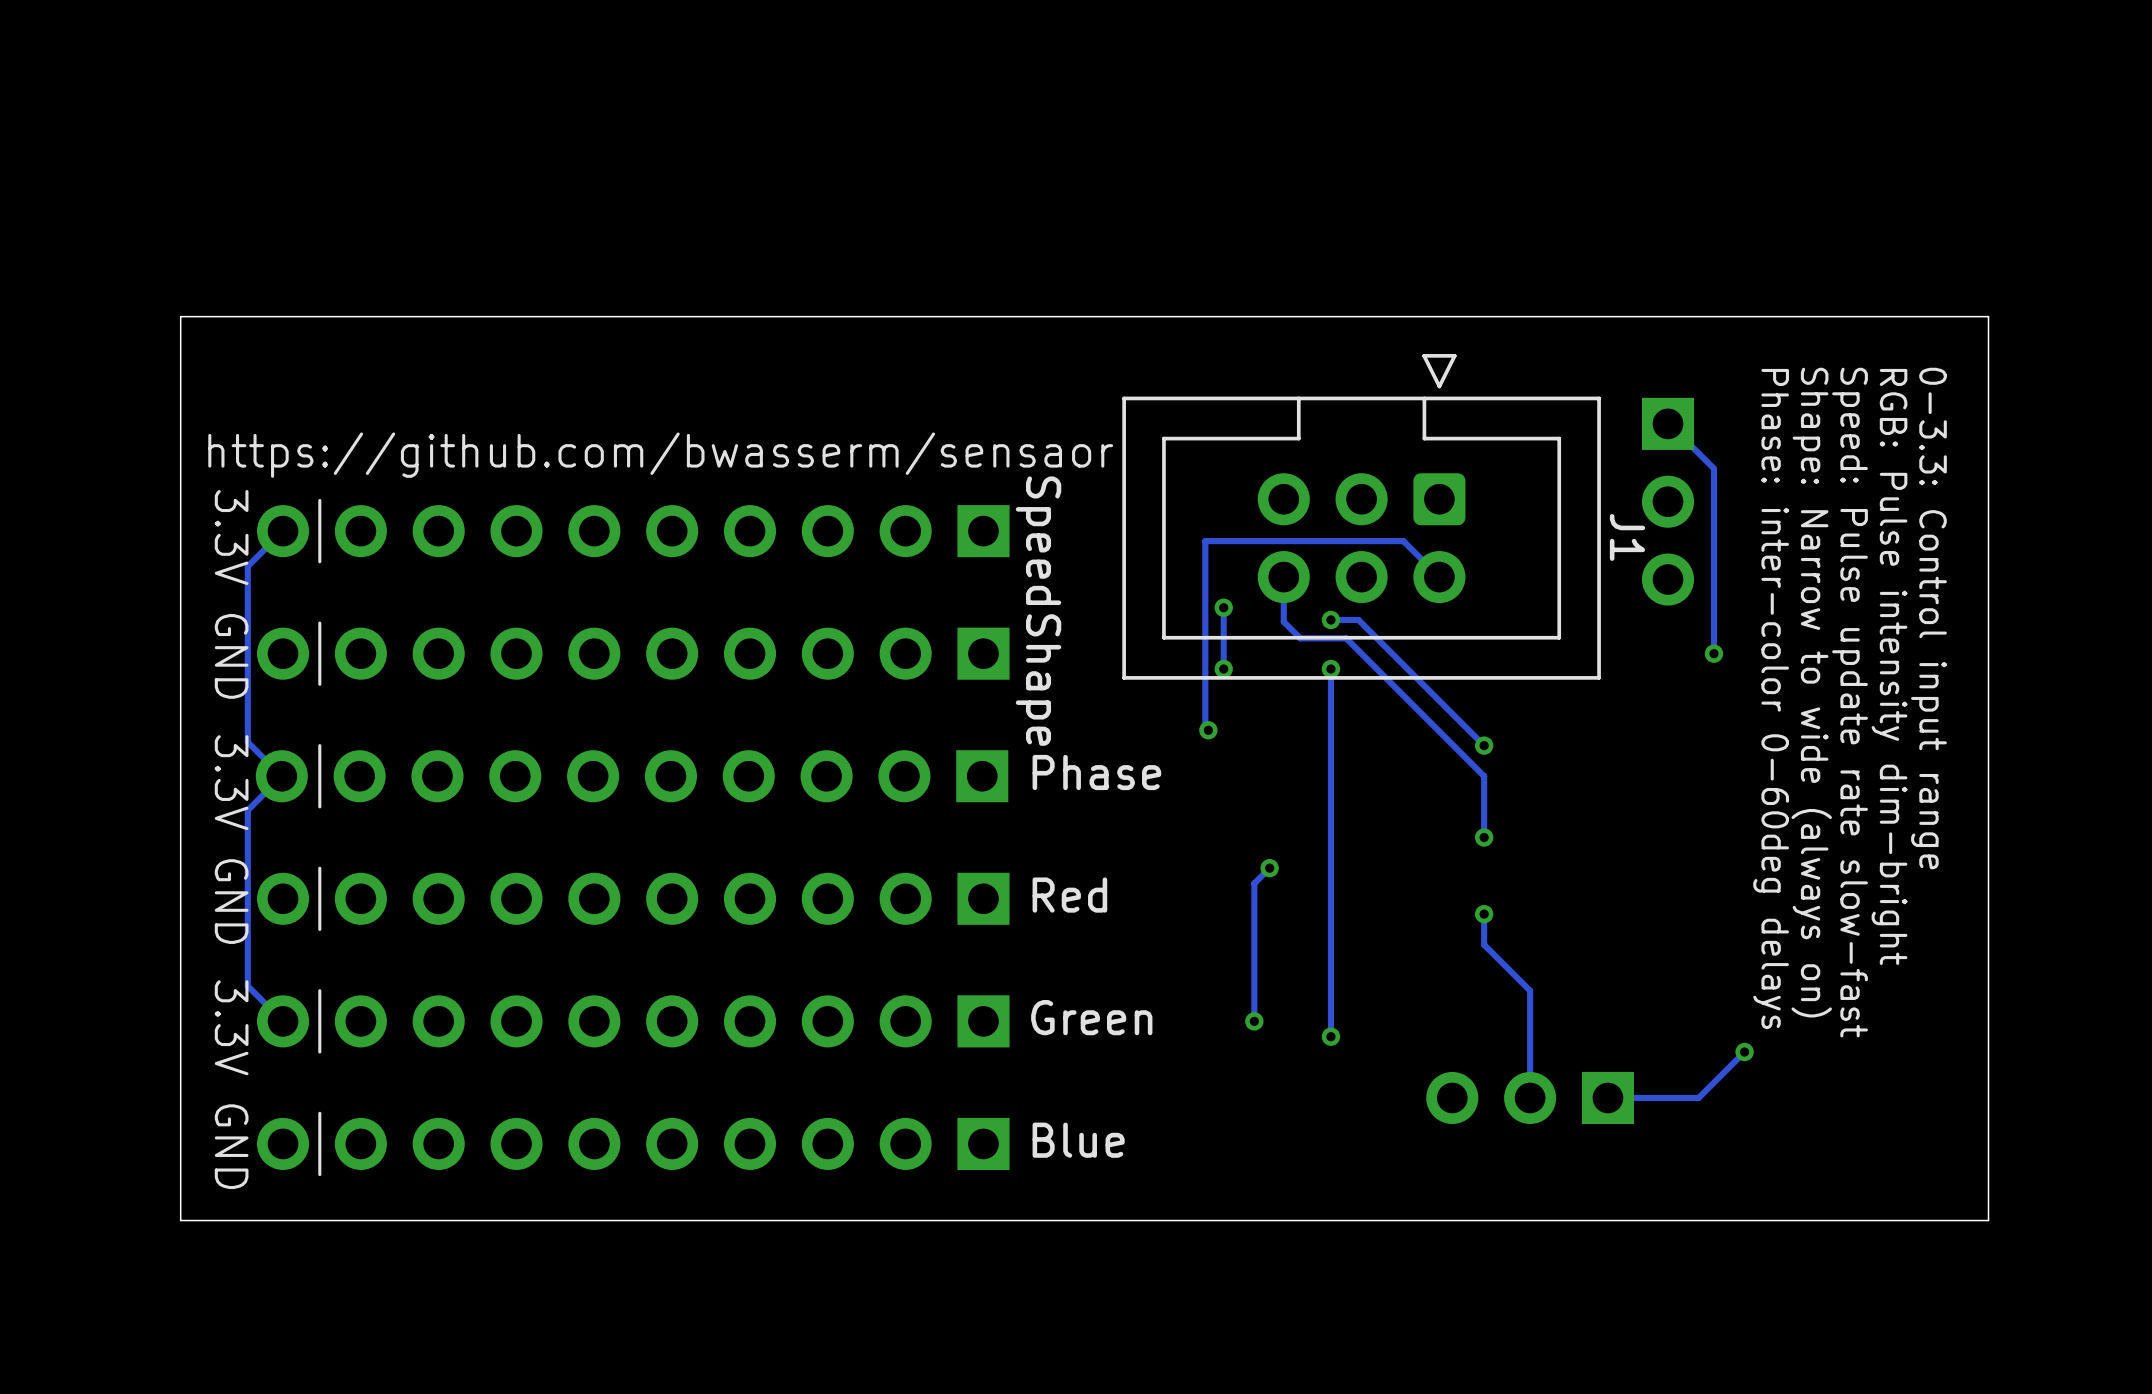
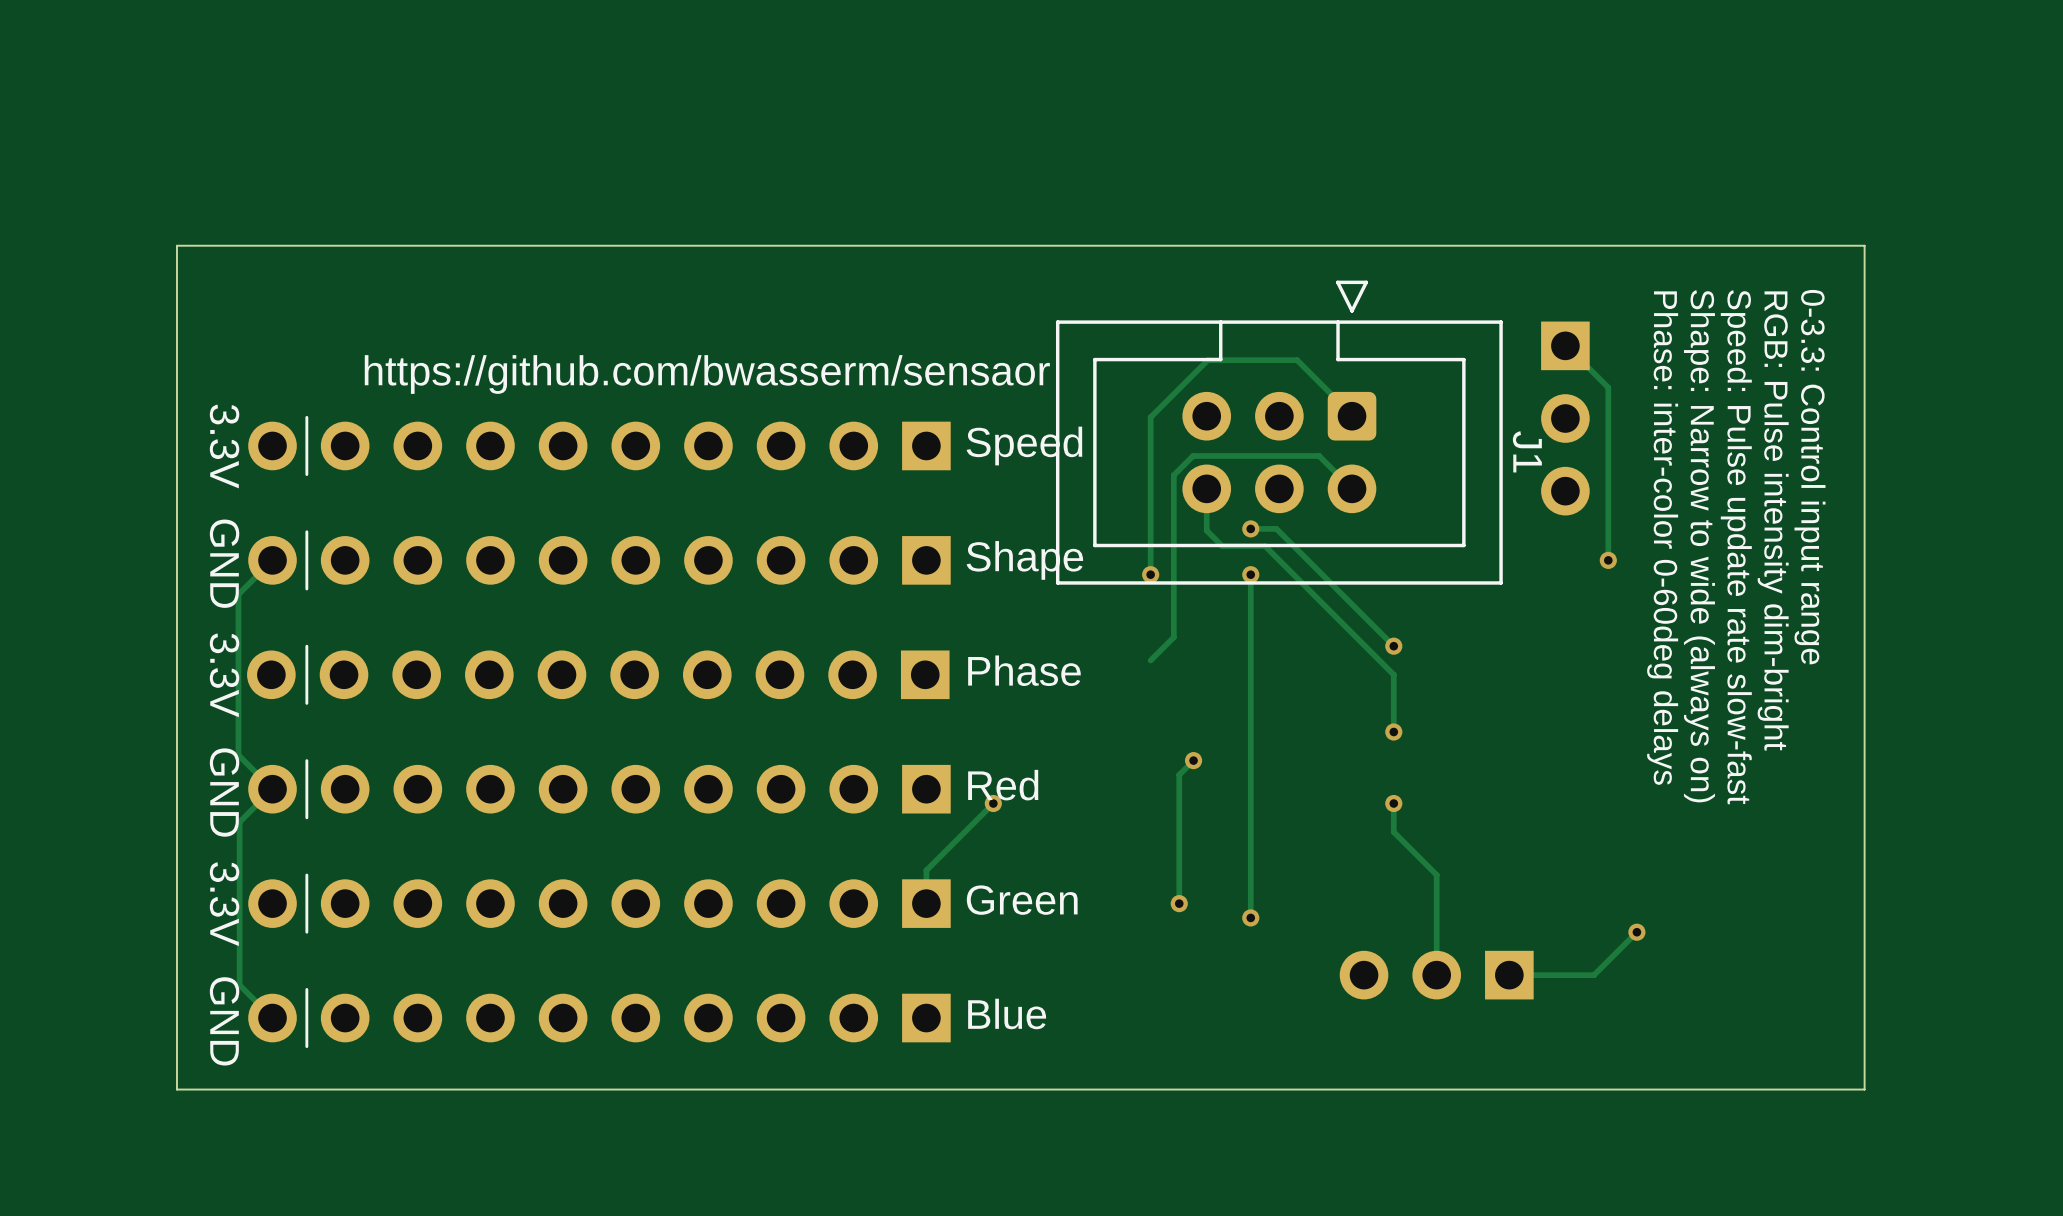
track: none -> (1353, 416) (1297, 360) (1207, 360) (1150, 417) (1150, 517)
track: (283, 531) (247, 566) (247, 742) (281, 776) (247, 810) (247, 934) -> (272, 560) (238, 594) (238, 755) (272, 789) (239, 822)
text rotation: 0° (1038, 540) -> 90° counterclockwise (1024, 446)
track: (1404, 541) (1205, 541) (1205, 727) (1208, 730) -> (1319, 455) (1193, 455) (1173, 475) (1173, 637) (1150, 660)
via: (1223, 607) -> none
text rotation: 0° (1038, 680) -> 90° counterclockwise (1024, 560)
via: (1208, 730) -> none
track: none -> (993, 803) (926, 870) (926, 903)
via: none -> (993, 803)
track: (247, 986) (283, 1021) -> (239, 870) (239, 985) (272, 1018)

